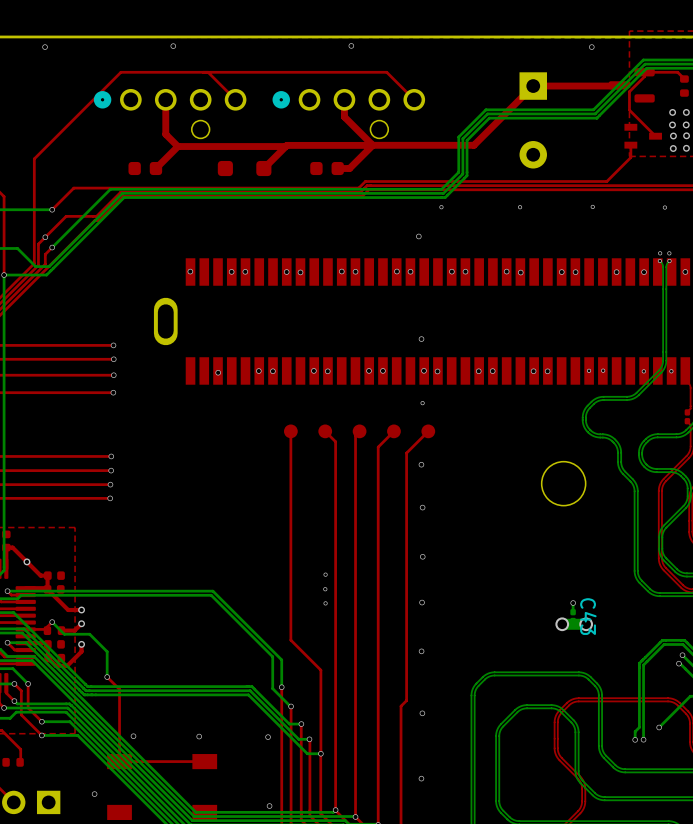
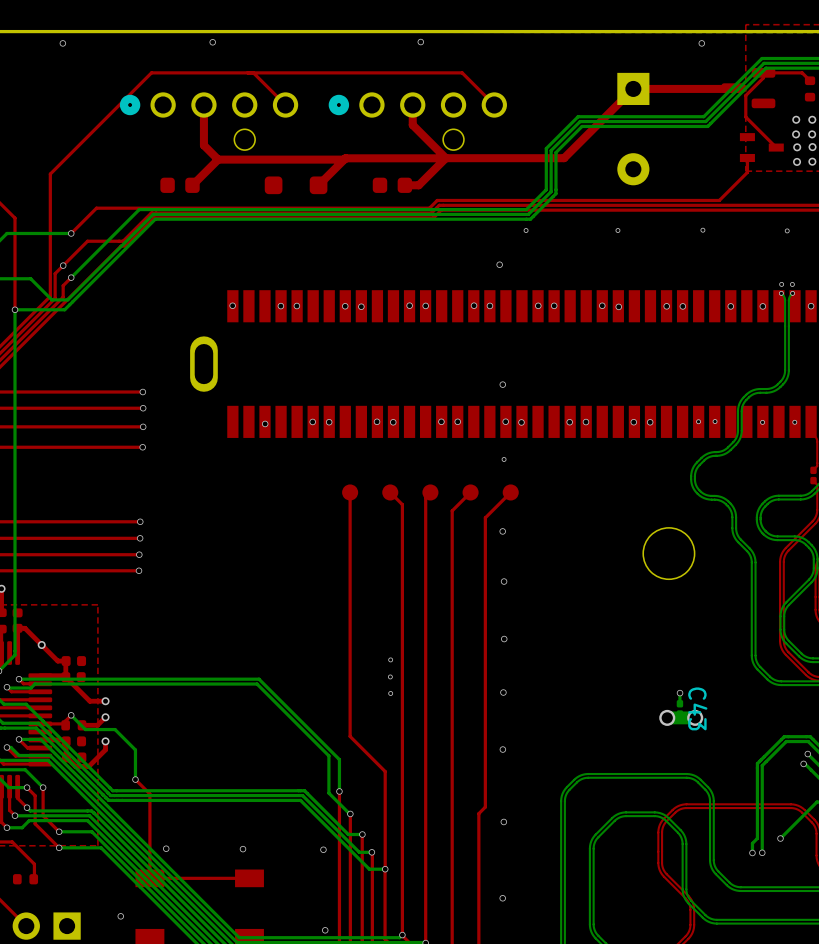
bottom track: (663, 326) (663, 361) (660, 369) (633, 395) (604, 396) -> (785, 370) (782, 379) (775, 386) (752, 390) (742, 399) (738, 408) (736, 438) (725, 449) (716, 452)
bottom track: (666, 326) (666, 362) (662, 370) (635, 397) (629, 399) (604, 400) -> (788, 370) (786, 379) (778, 388) (771, 392) (754, 393) (745, 401) (742, 408) (741, 432) (739, 440) (728, 451) (716, 455)

